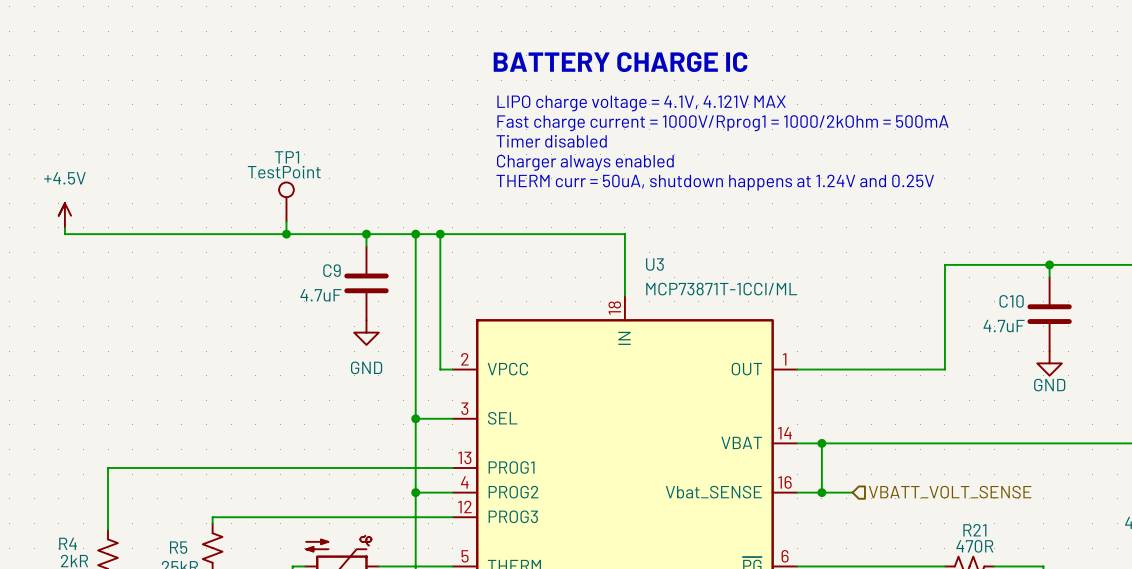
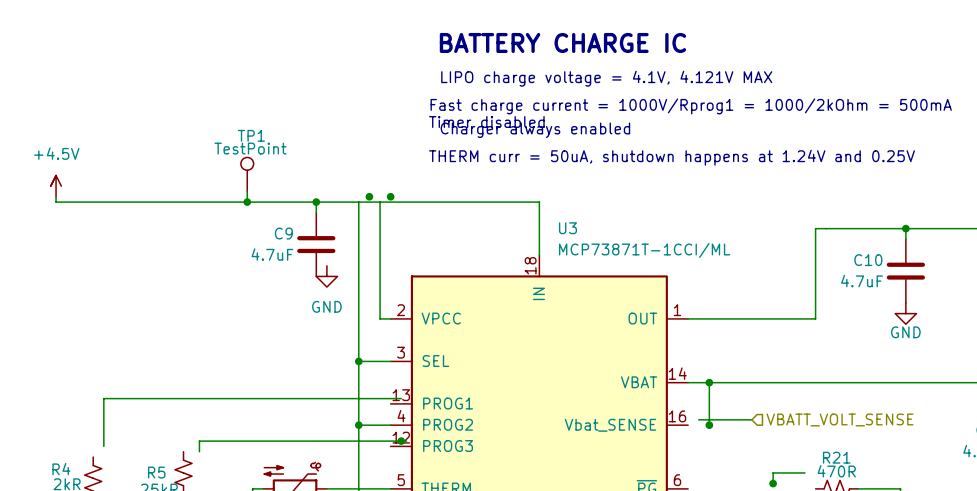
text position: BATTERY CHARGE IC (620, 62) -> BATTERY CHARGE IC (562, 42)
text position: LIPO charge voltage = 4.1V, 4.121V MAX (641, 103) -> LIPO charge voltage = 4.1V, 4.121V MAX (606, 78)
text position: Charger always enabled (585, 162) -> Charger always enabled (535, 130)
junction: none -> (369, 196)
junction: none -> (390, 196)
junction: (415, 234) -> none
junction: (440, 234) -> none
power symbol position: GND (366, 332) -> GND (326, 276)
wire: none -> (401, 398) (103, 398) (103, 446)
wire: (452, 468) (108, 468) (108, 529) -> none
wire: none -> (698, 419) (751, 419)
wire: (797, 492) (852, 492) -> none
hierarchical label position: VBATT_VOLT_SENSE (950, 492) -> VBATT_VOLT_SENSE (840, 419)
junction: none -> (401, 441)
wire: none -> (406, 441) (199, 441) (199, 451)
wire: (452, 517) (212, 517) (212, 523) -> none
wire: none -> (804, 472) (773, 472) (773, 483)
junction: none -> (773, 483)
wire: (797, 566) (944, 566) -> none

